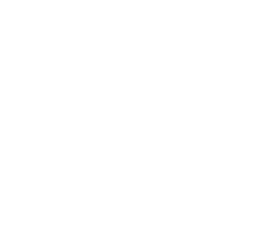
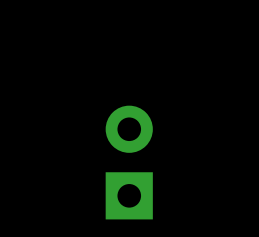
part: none -> (129, 162)

